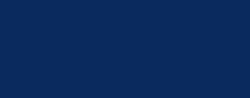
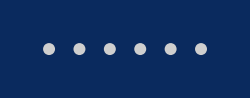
part: none -> (49, 49)
part: none -> (79, 49)
part: none -> (109, 49)
part: none -> (140, 49)
part: none -> (170, 49)
part: none -> (201, 49)

